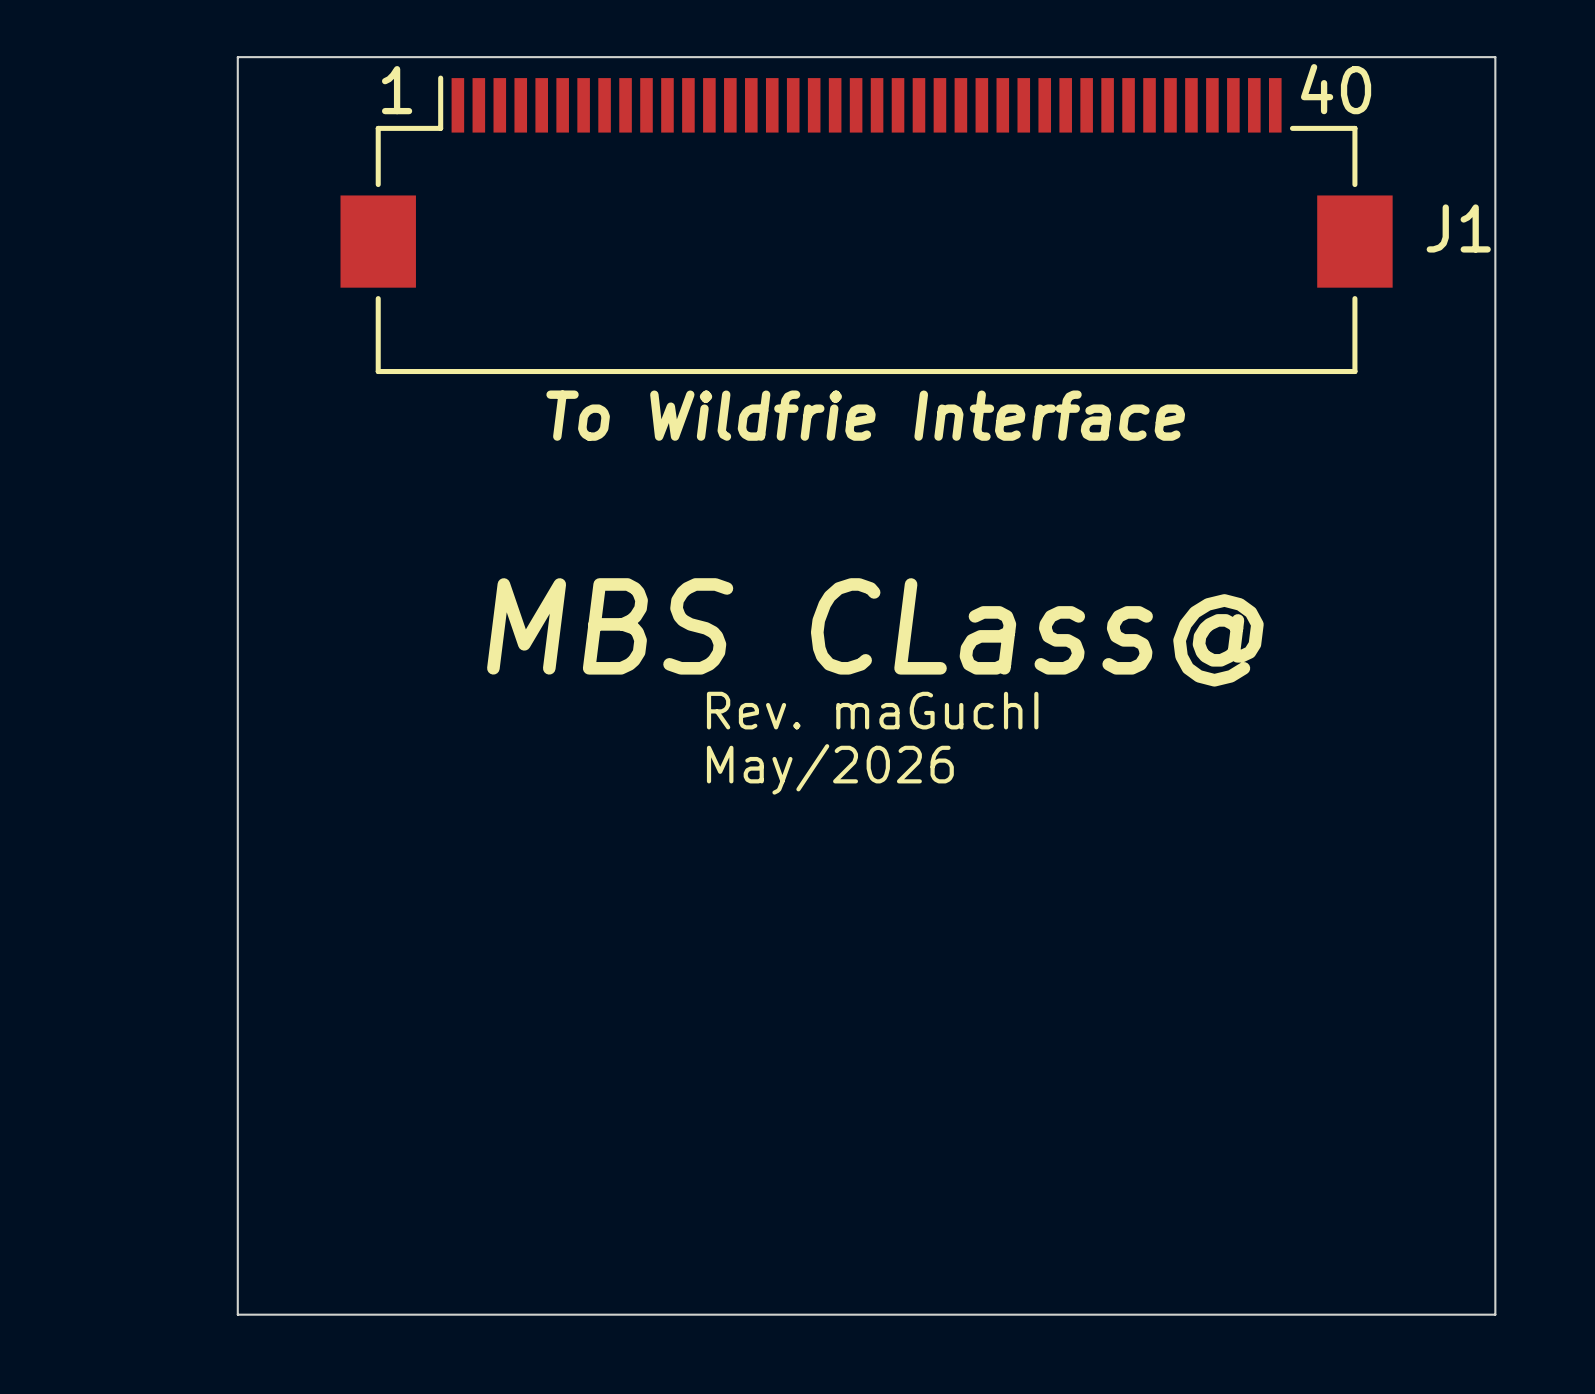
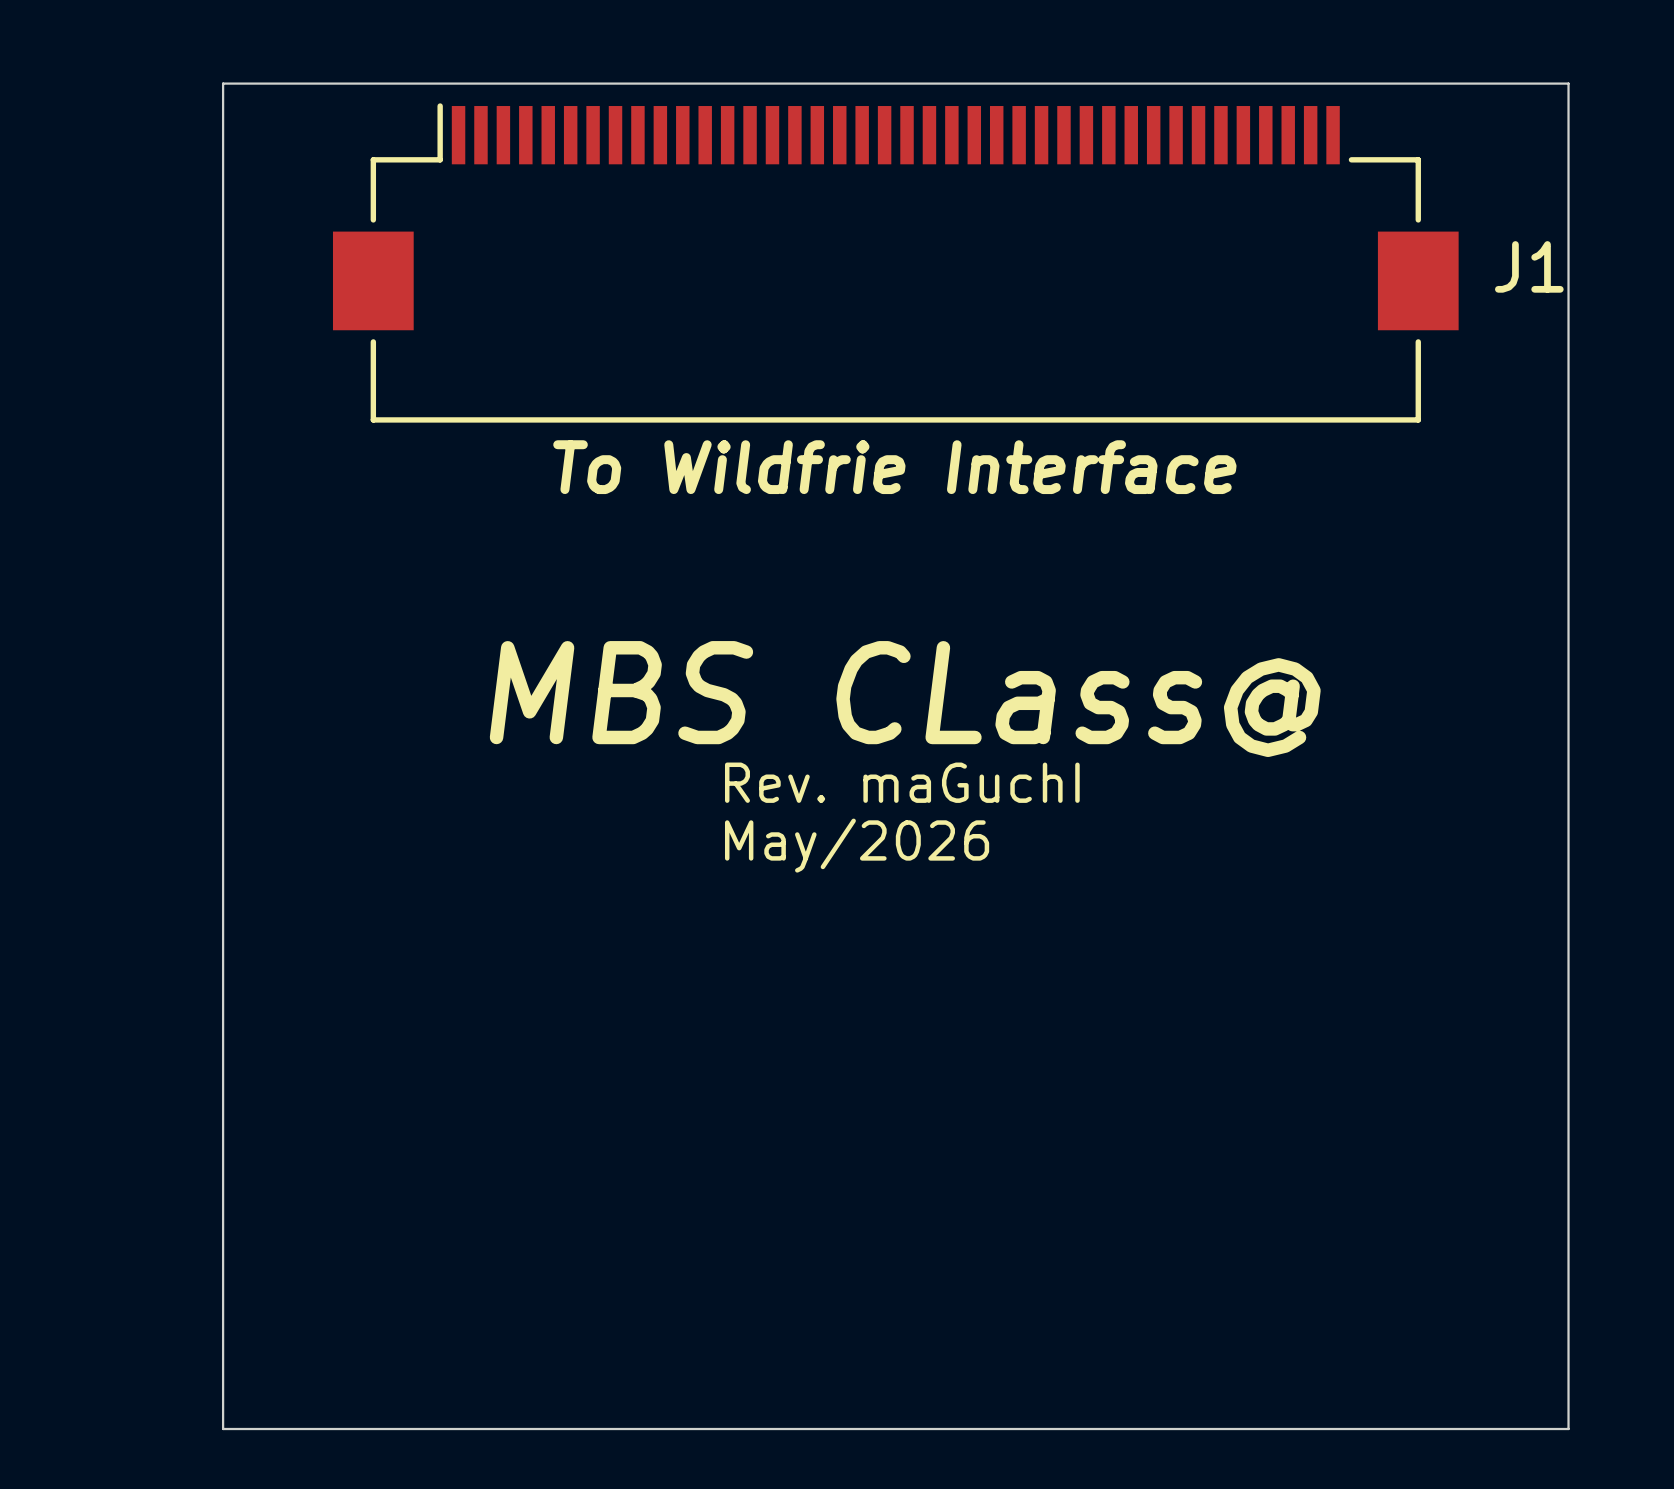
text: 40 (1336, 89) -> none
text: 1 (397, 90) -> none

